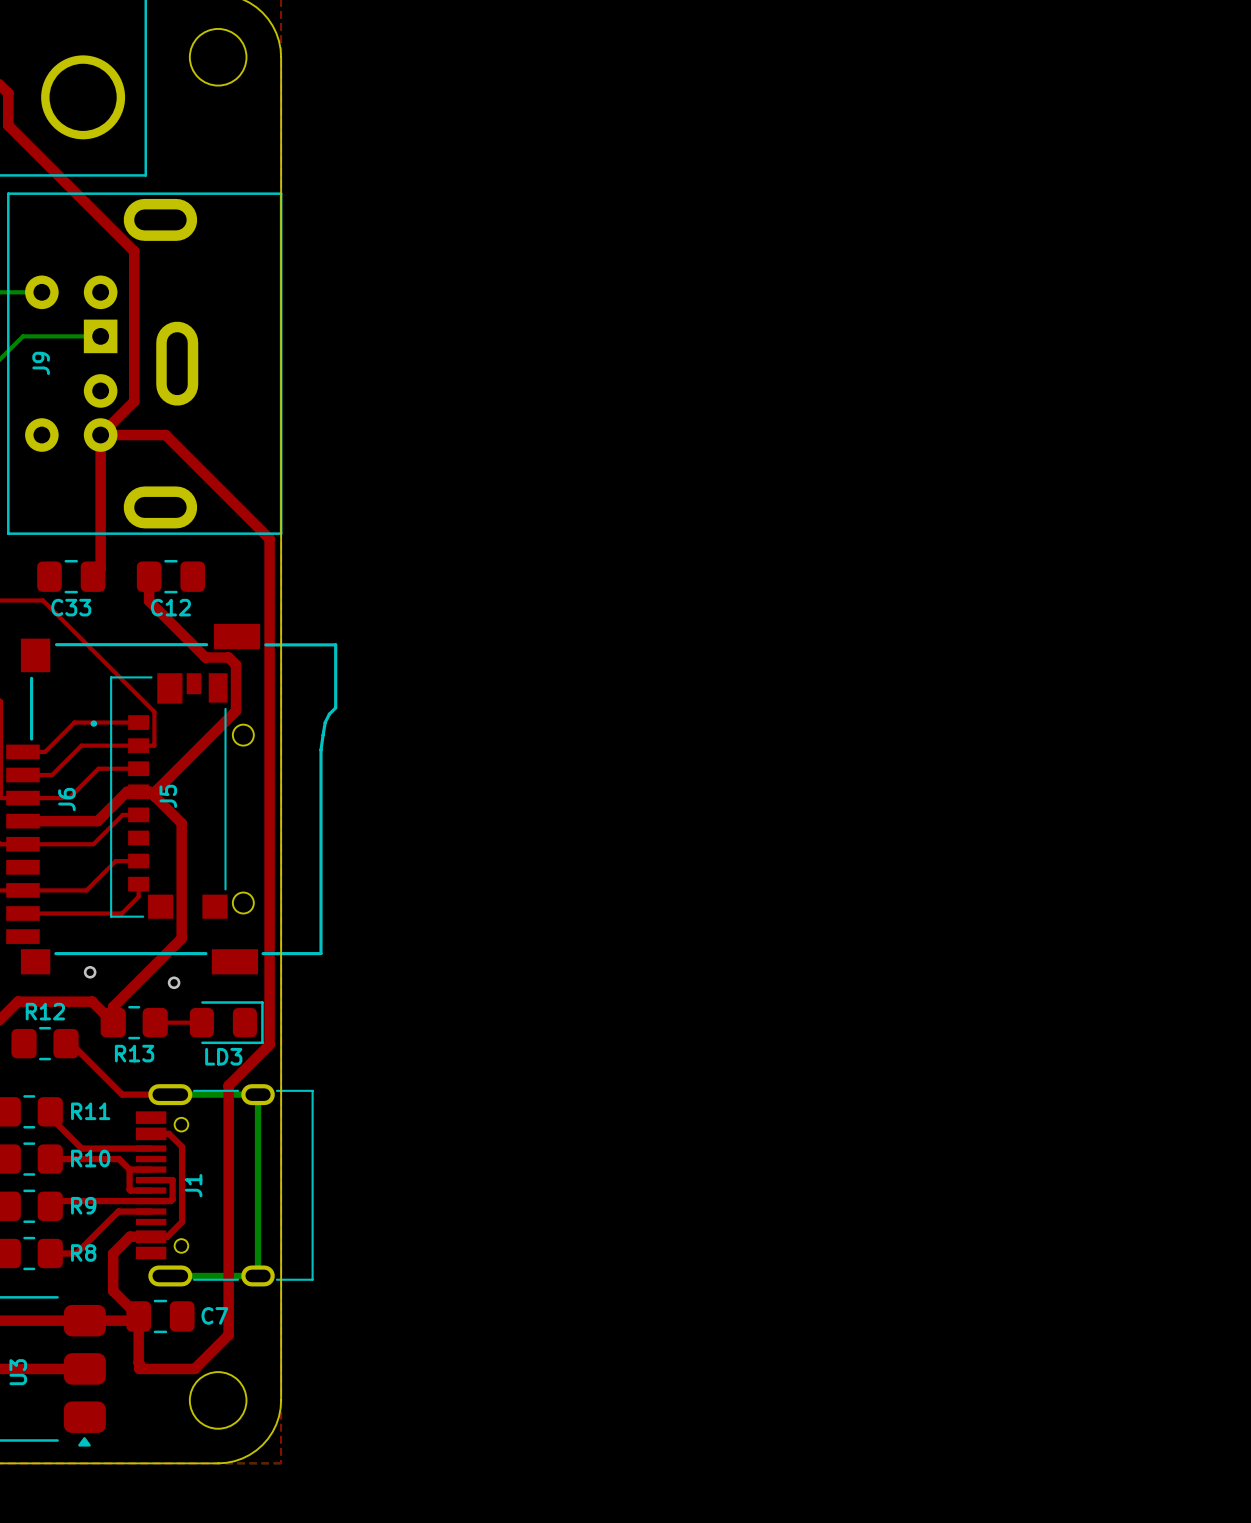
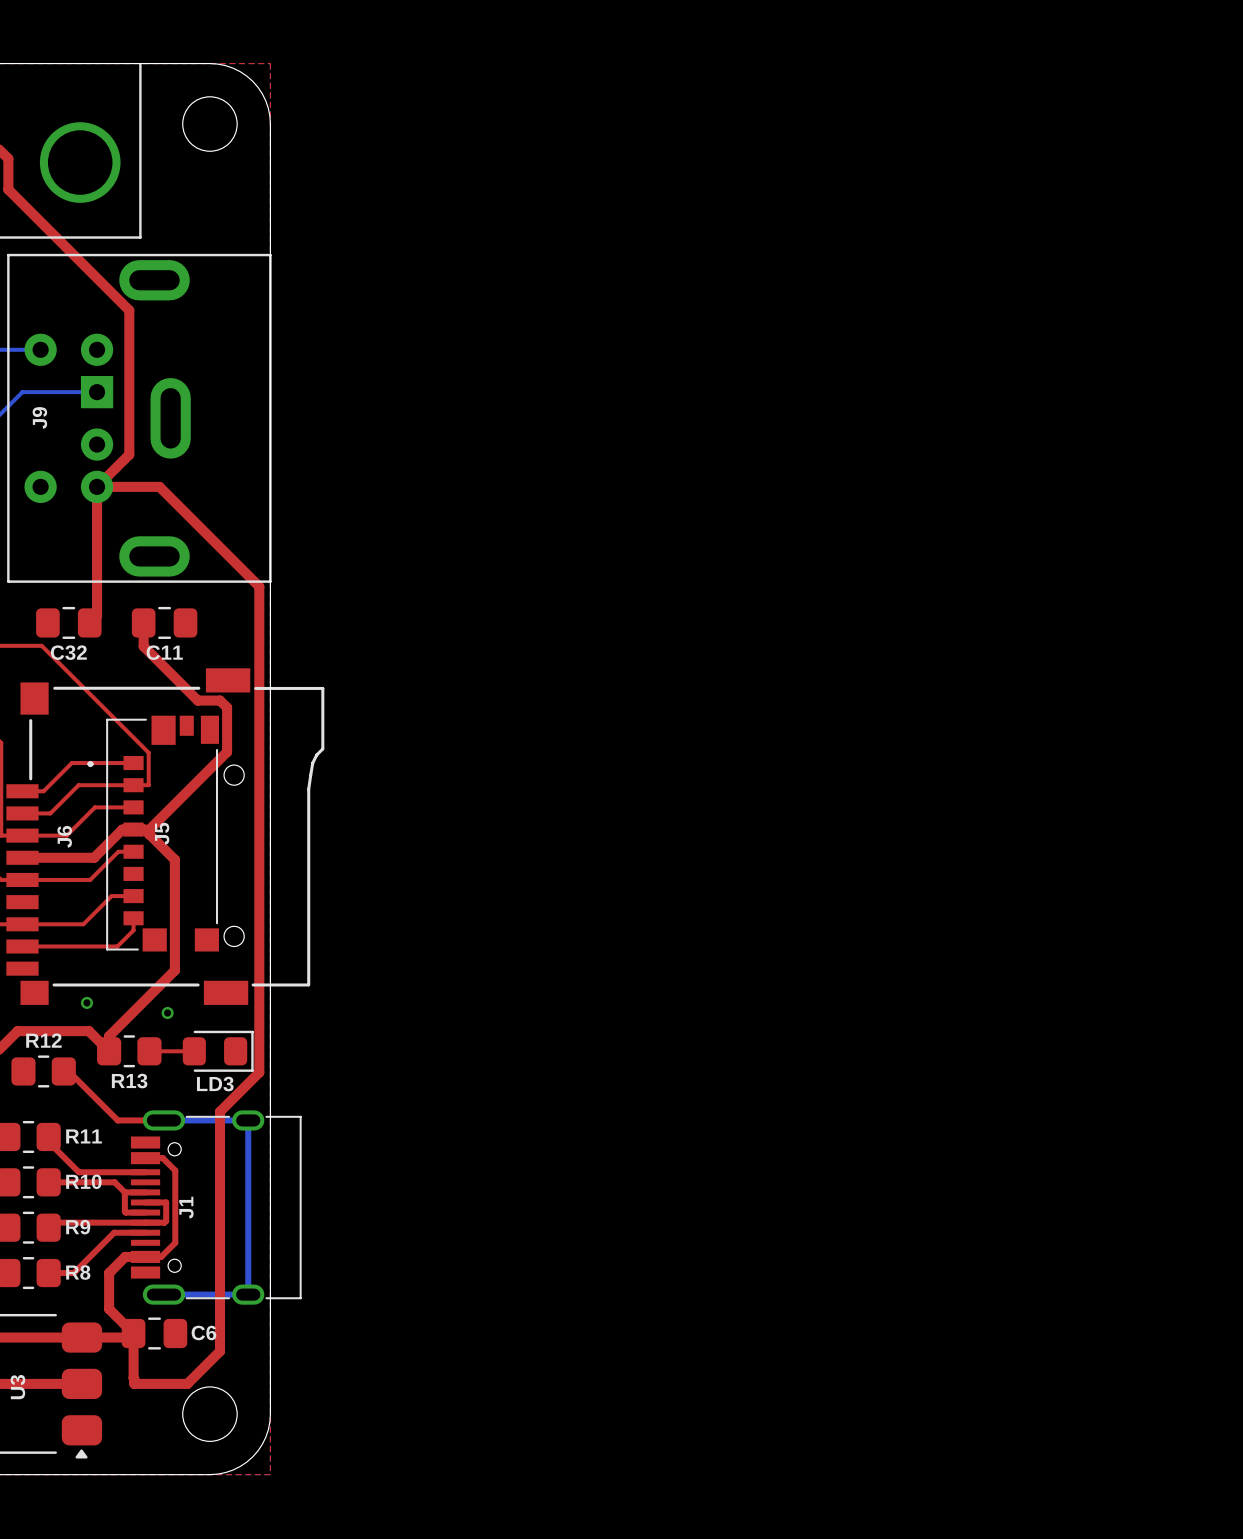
C33 name: C33 (71, 607) -> C32 (68, 652)
C12 name: C12 (170, 607) -> C11 (164, 652)
C7 name: C7 (214, 1315) -> C6 (203, 1332)

